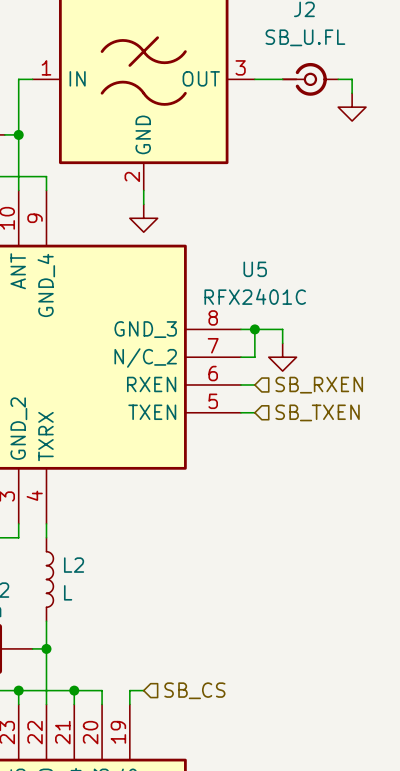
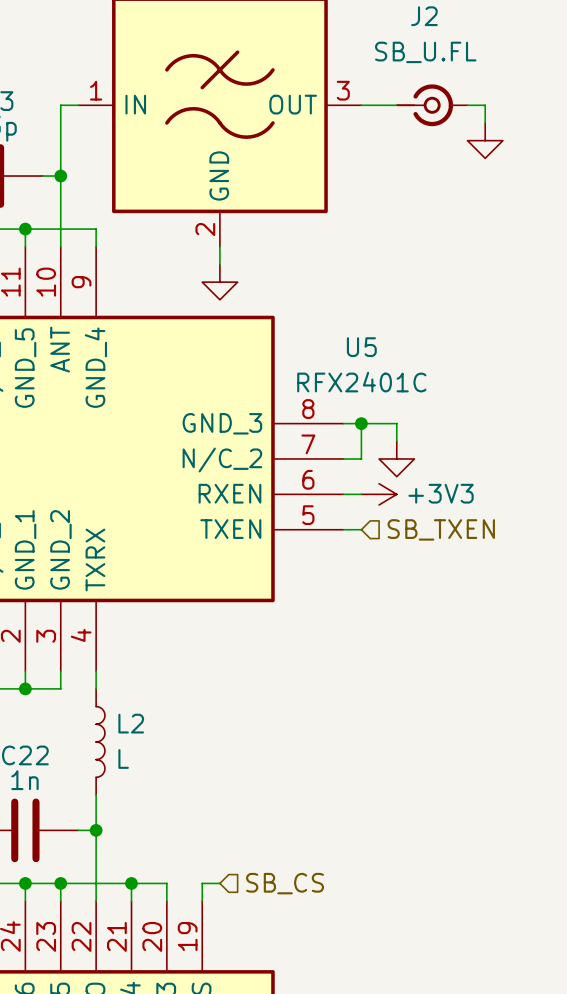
power symbol: none -> +3V3 (379, 494)
hierarchical label: SB_RXEN (319, 385) -> none

